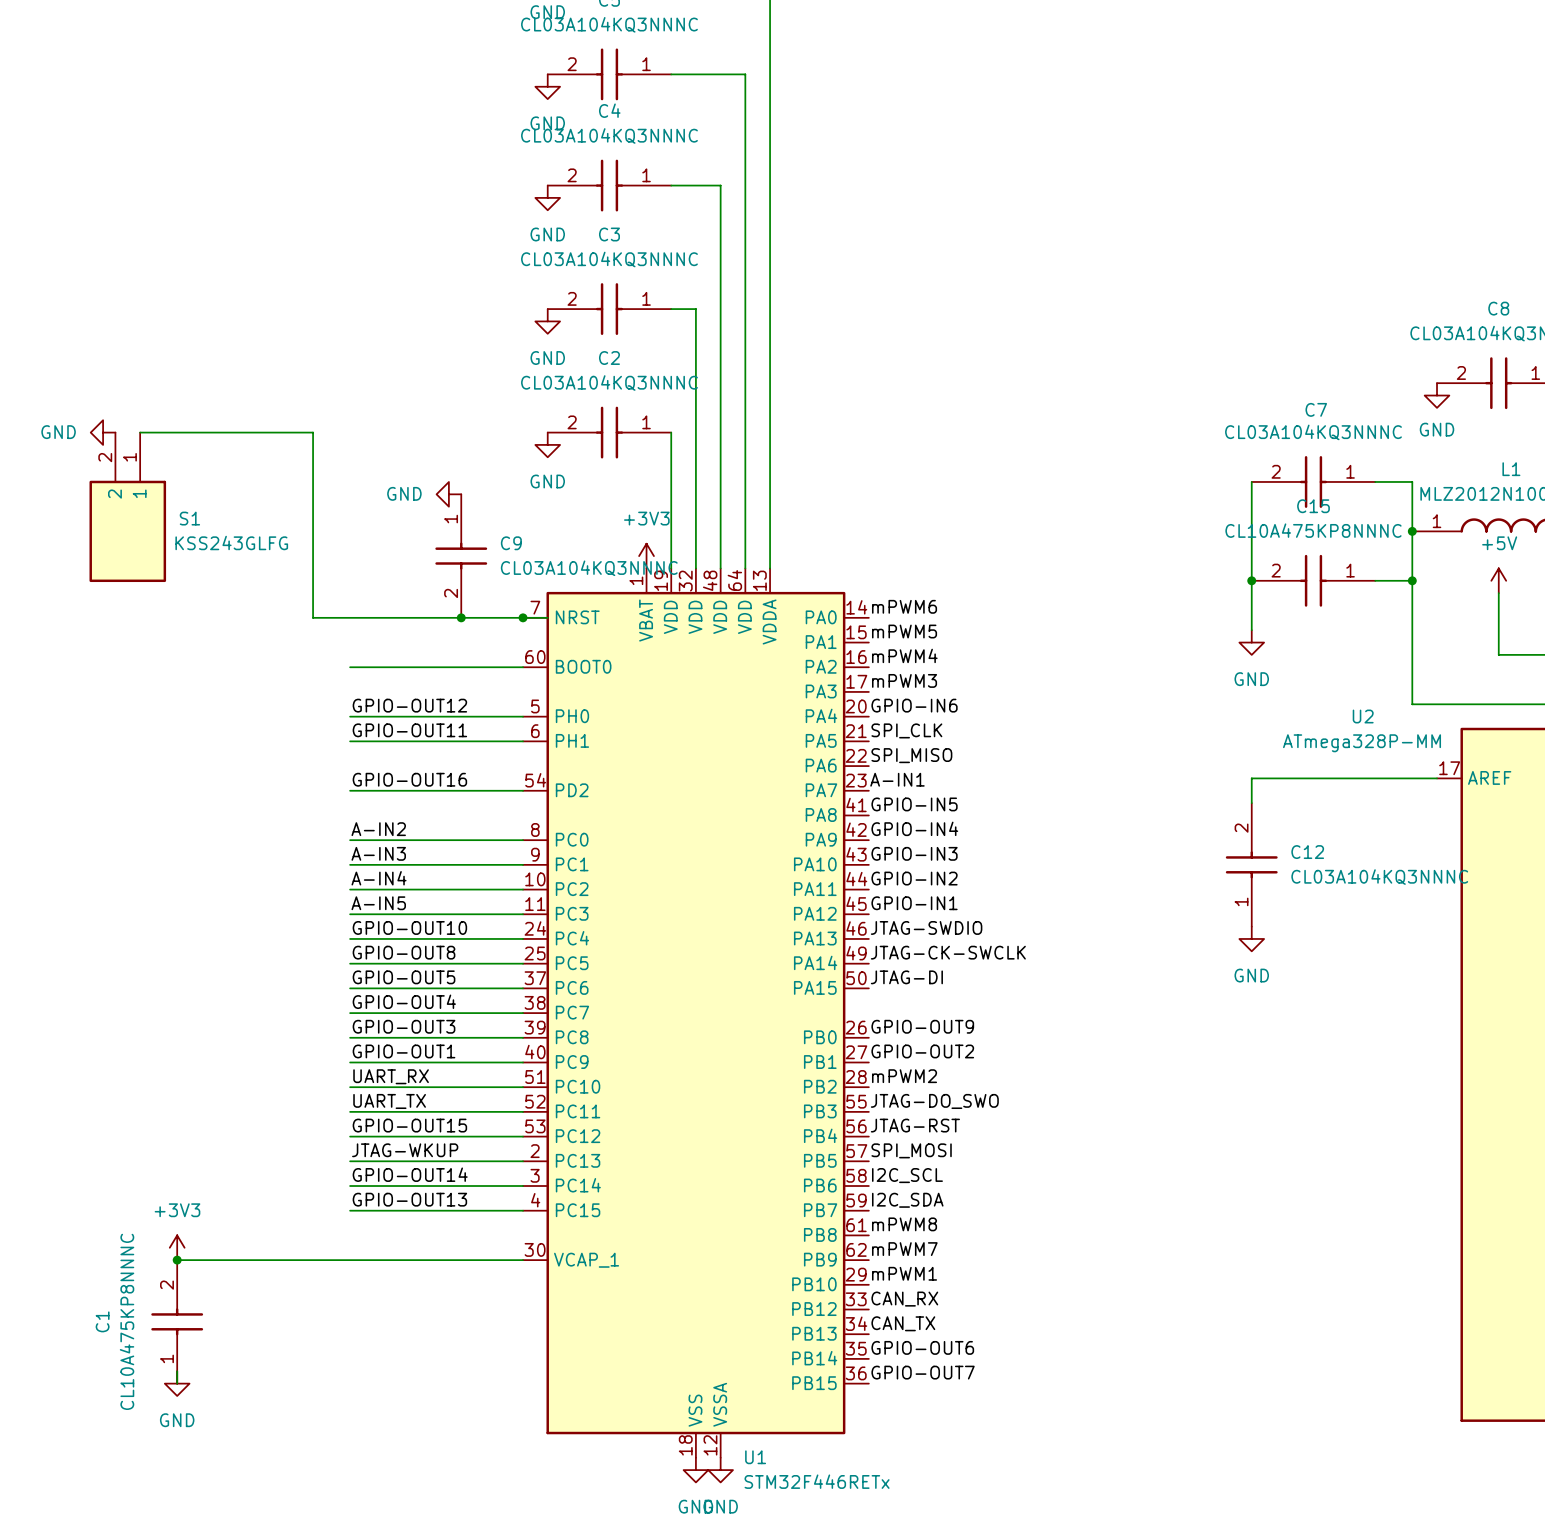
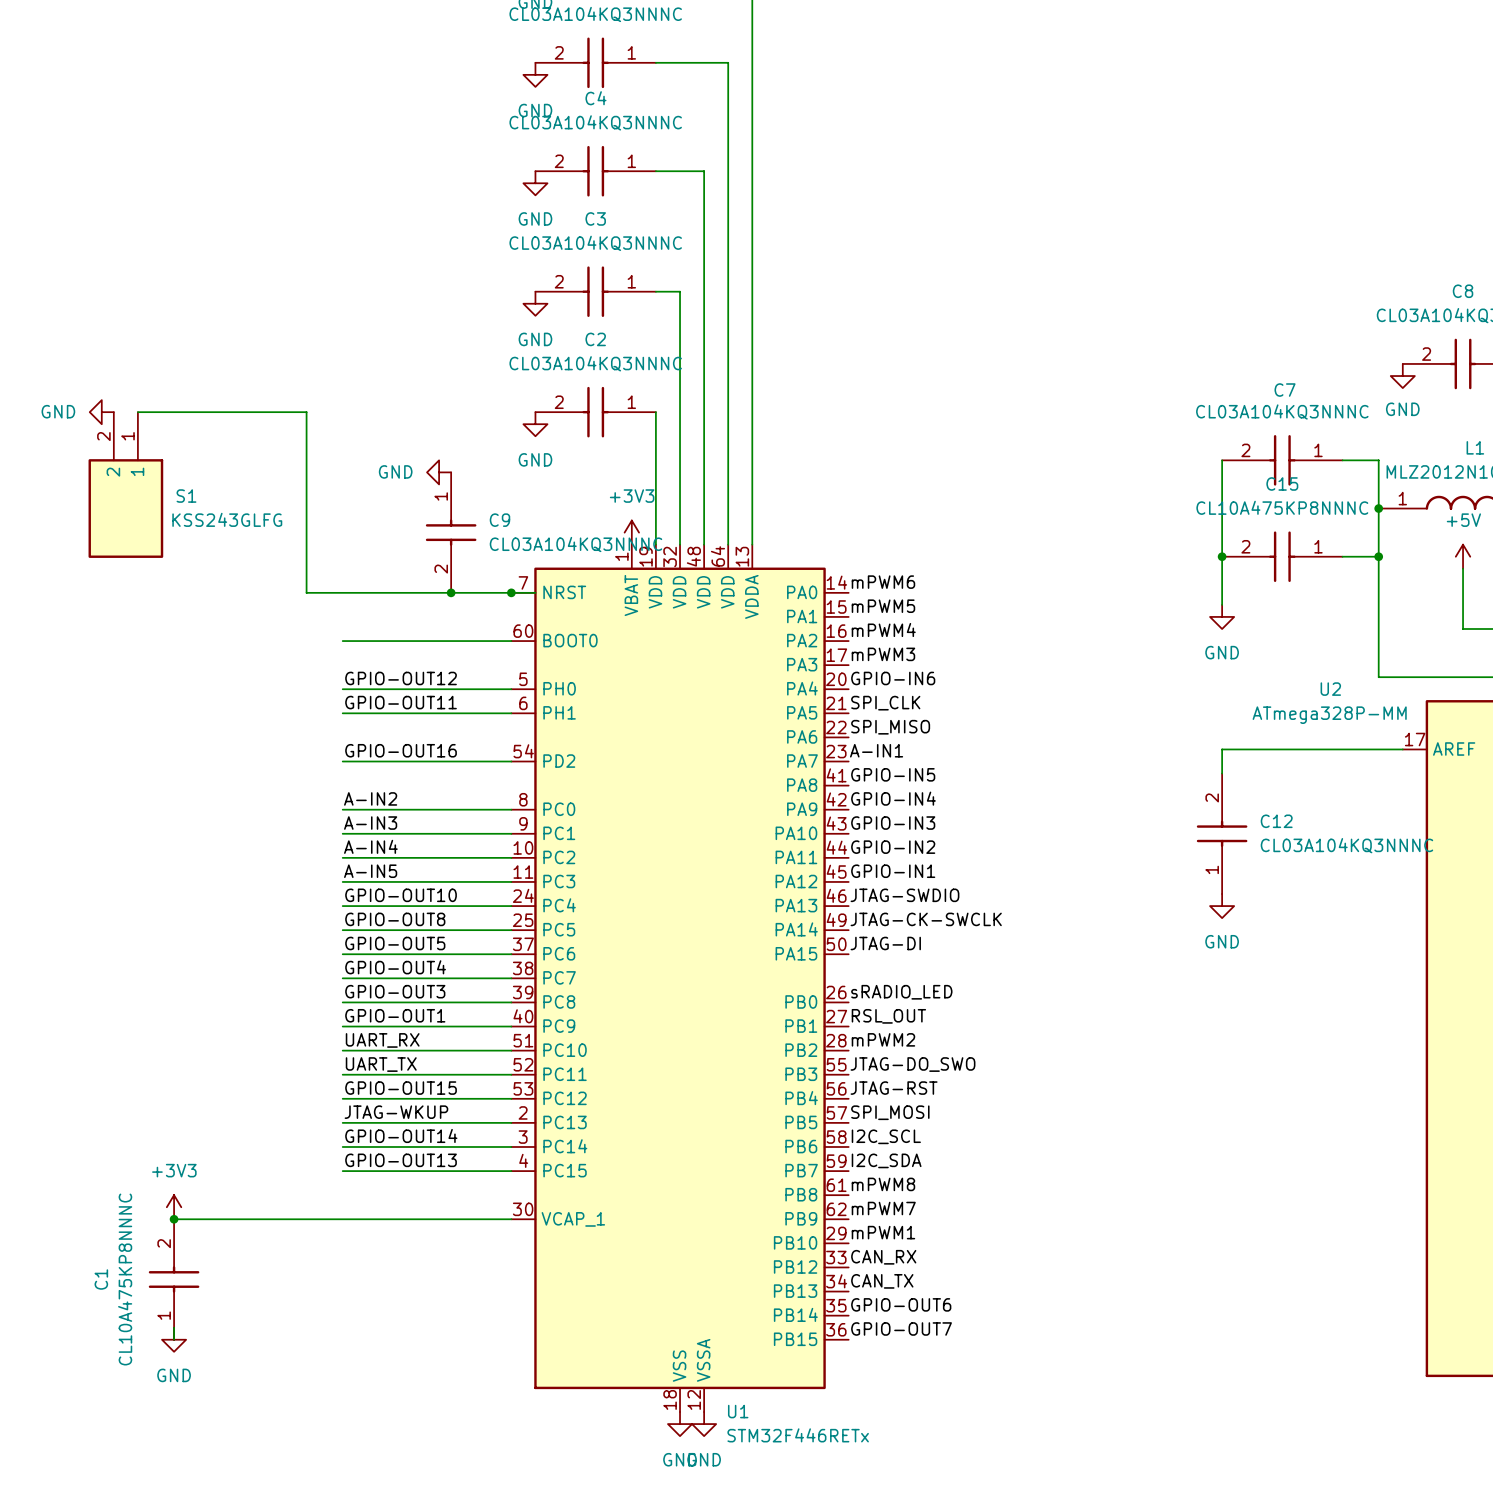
label: GPIO-OUT9 (922, 1026) -> sRADIO_LED (901, 992)
label: GPIO-OUT2 (922, 1051) -> RSL_OUT (888, 1016)

